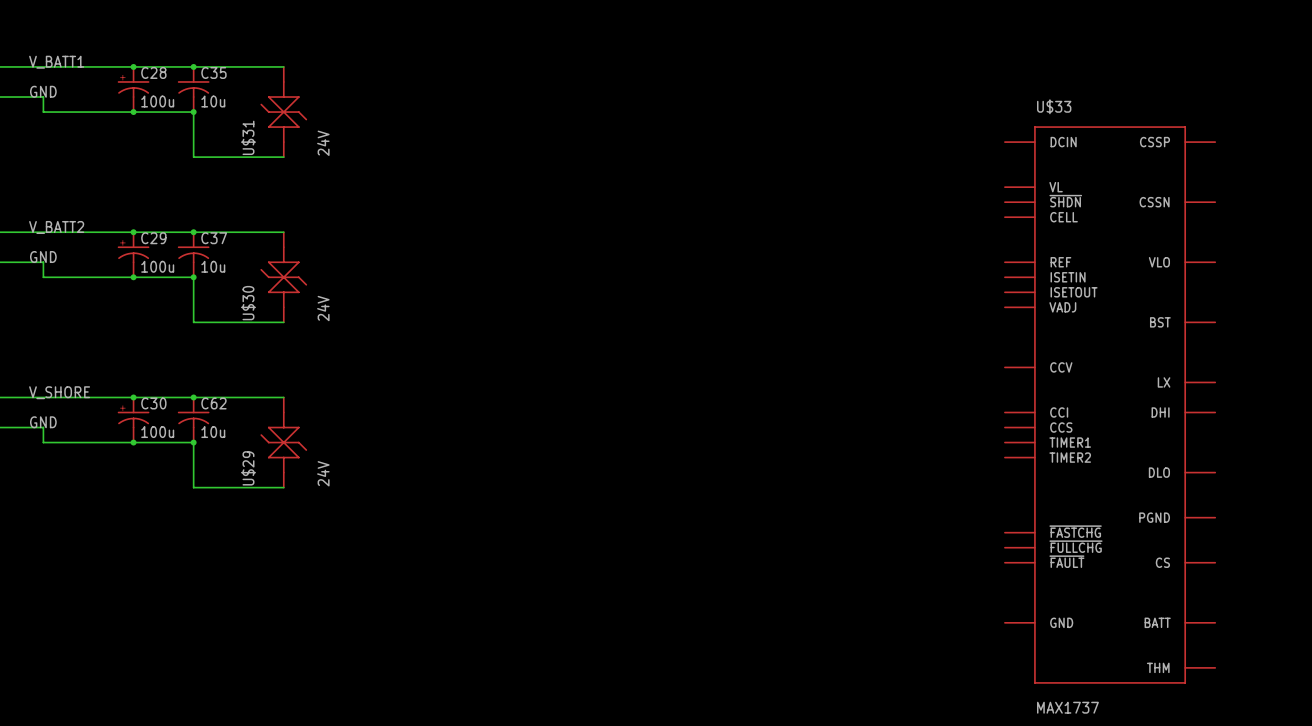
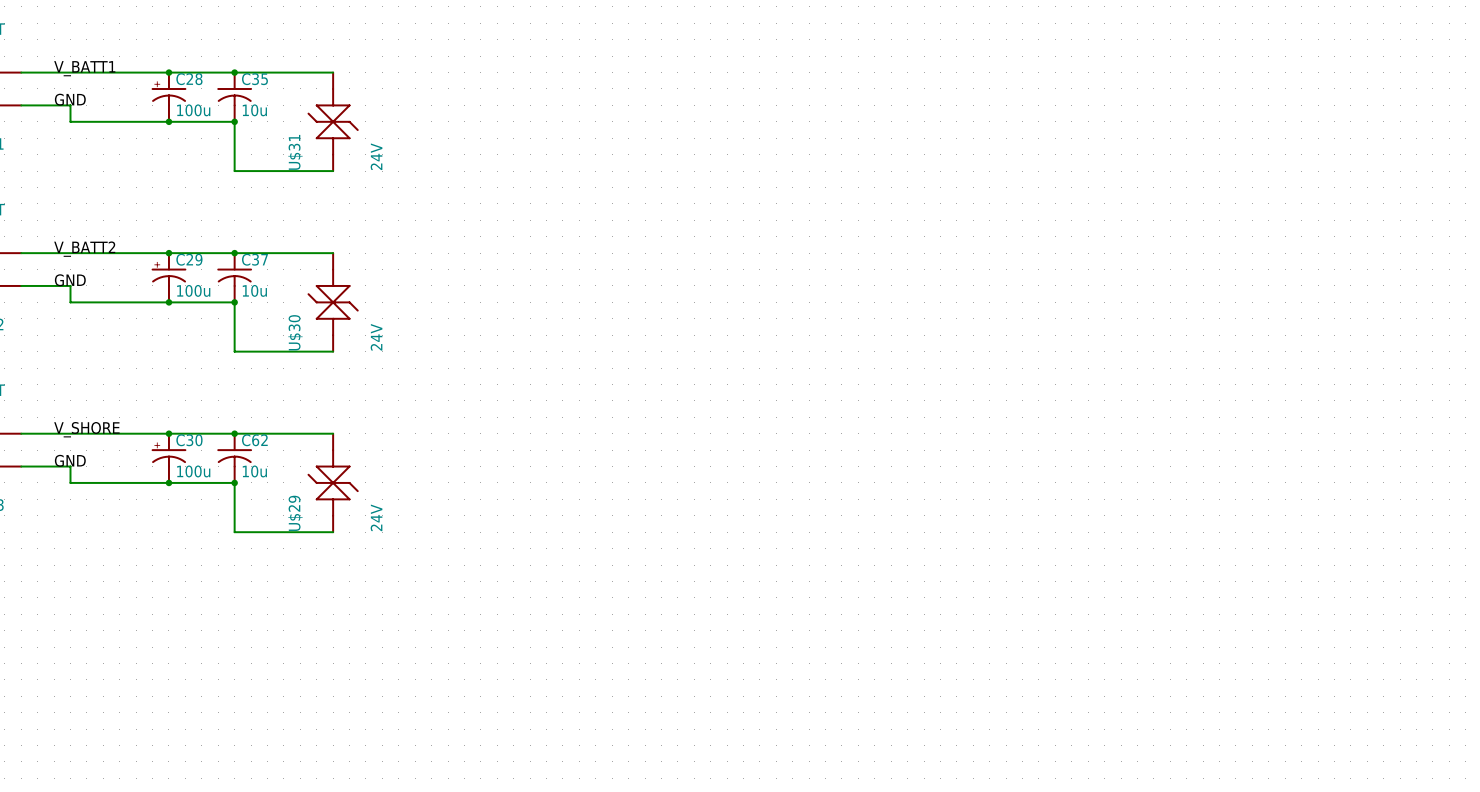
U$33: MAX1737 (1110, 404) -> none

